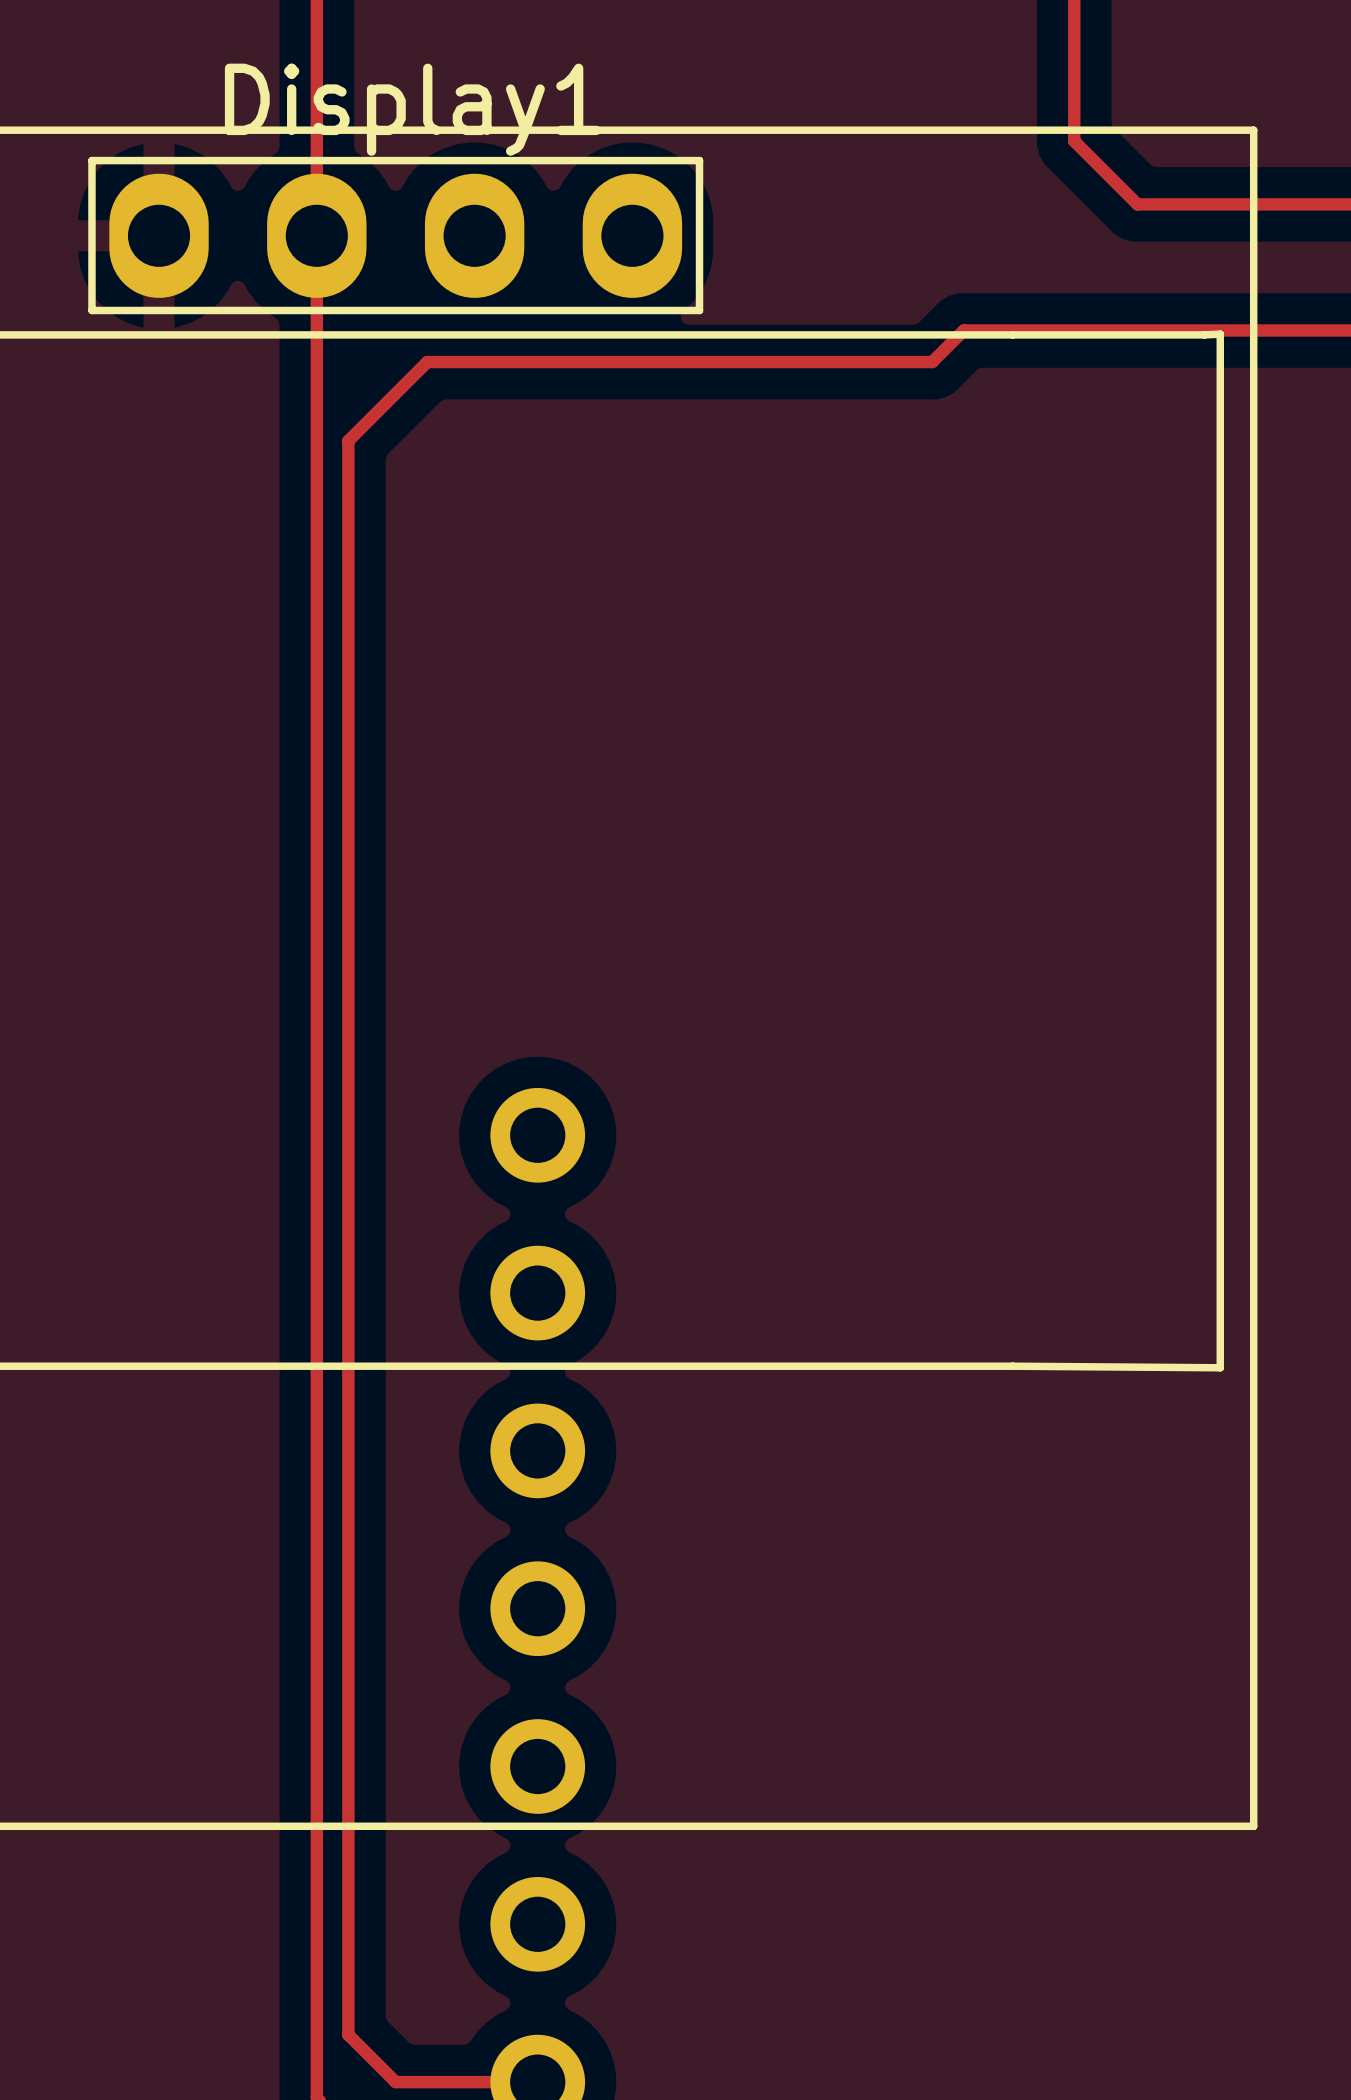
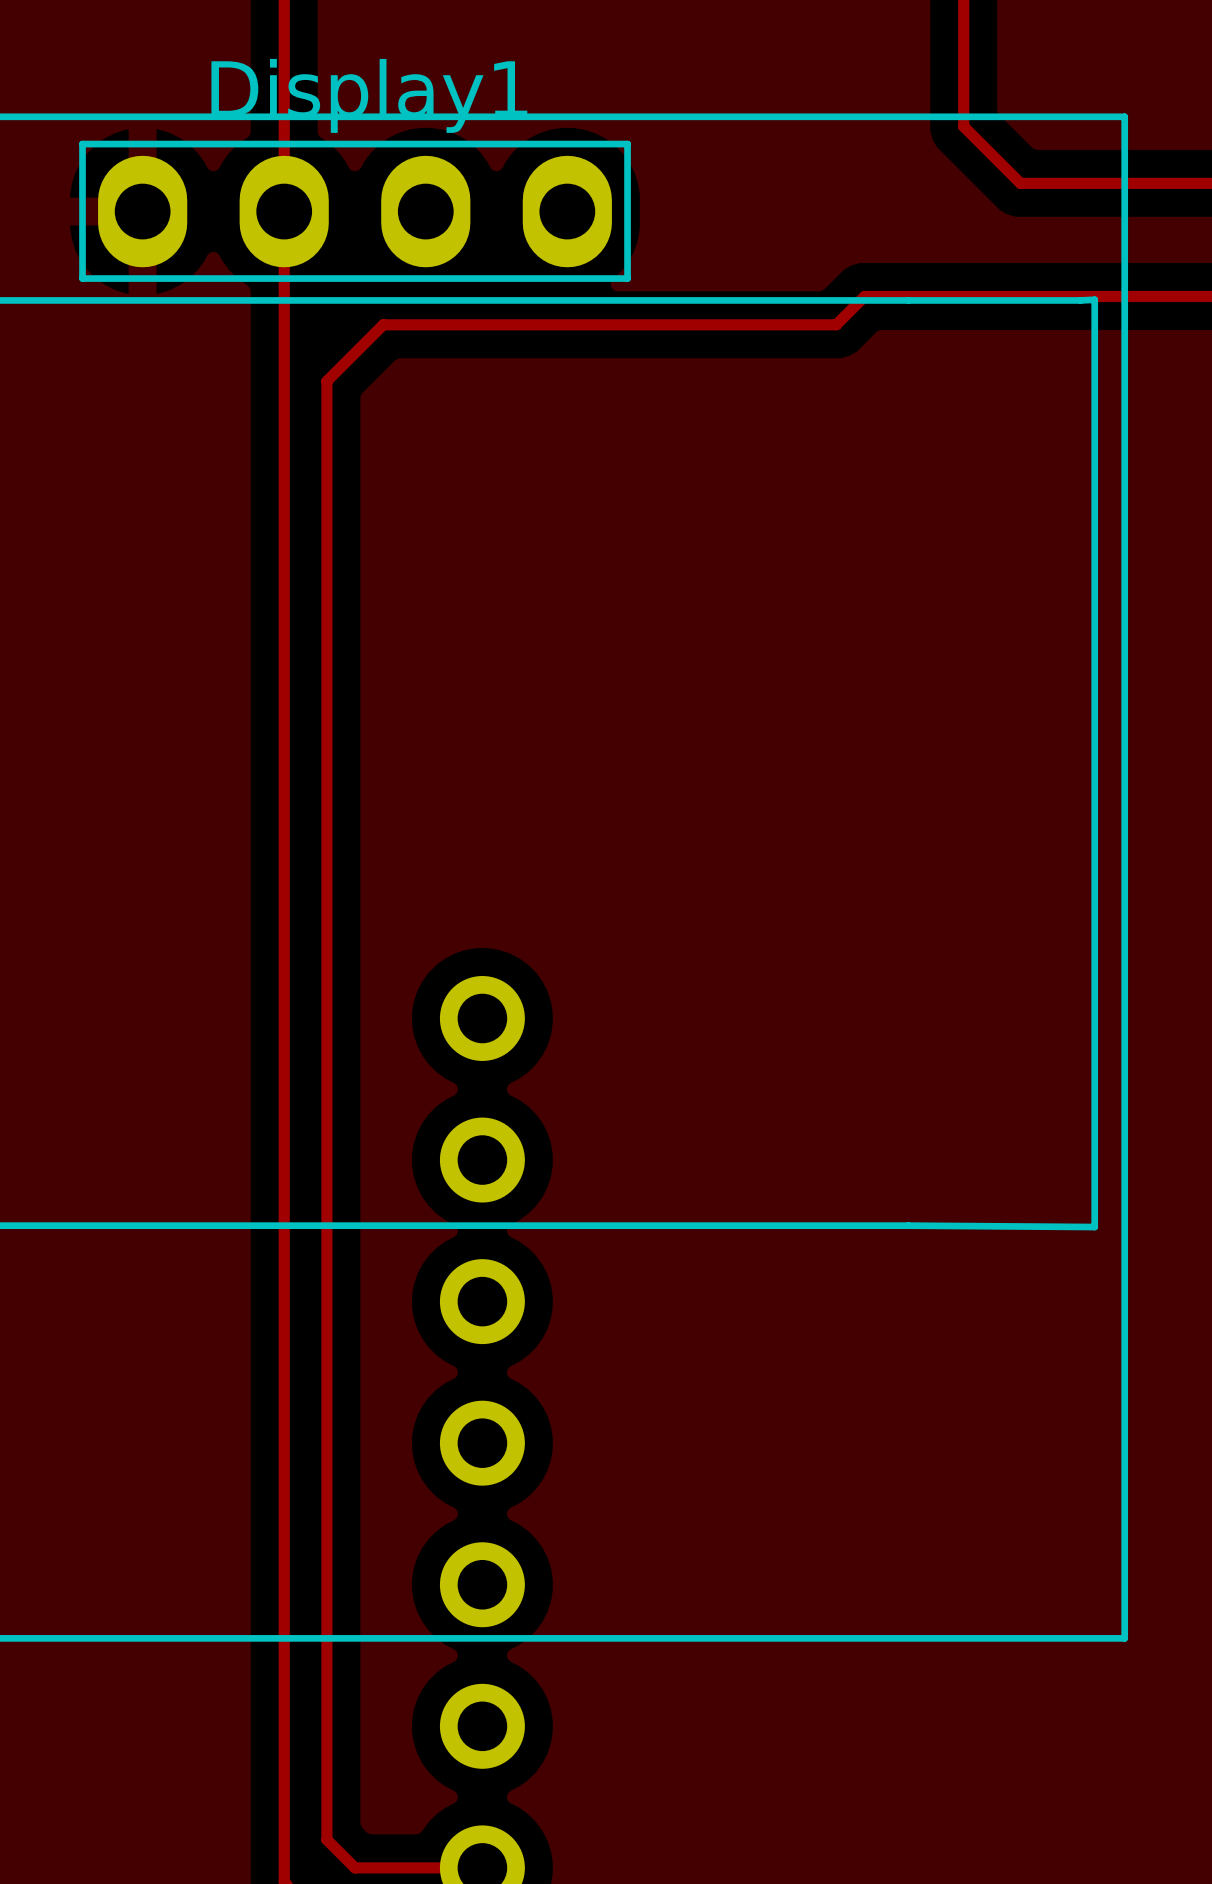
track: (364, 424) (348, 440) (348, 2034) (364, 2050) -> (326, 381) (326, 1839)

